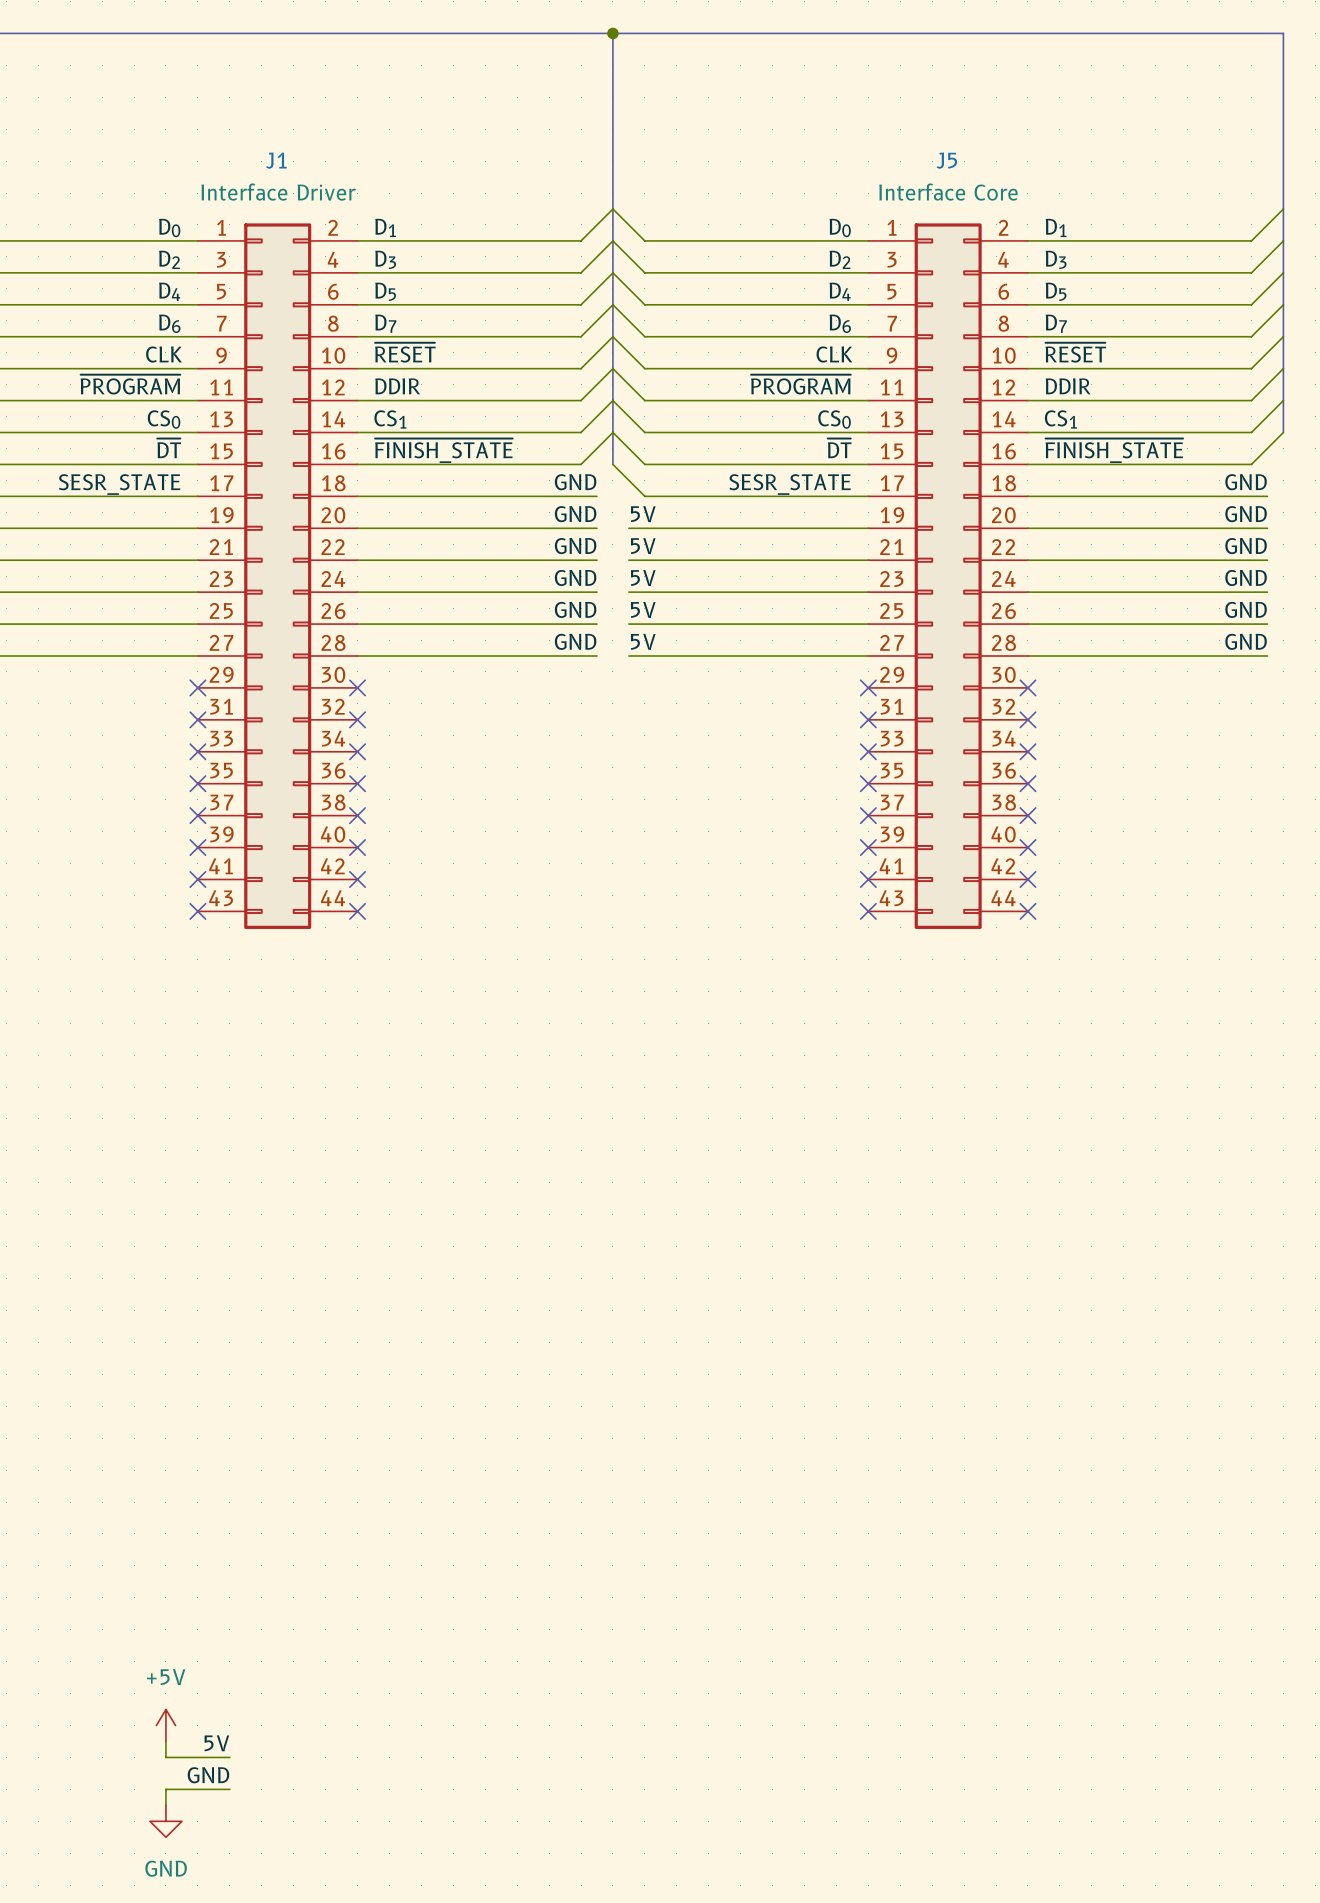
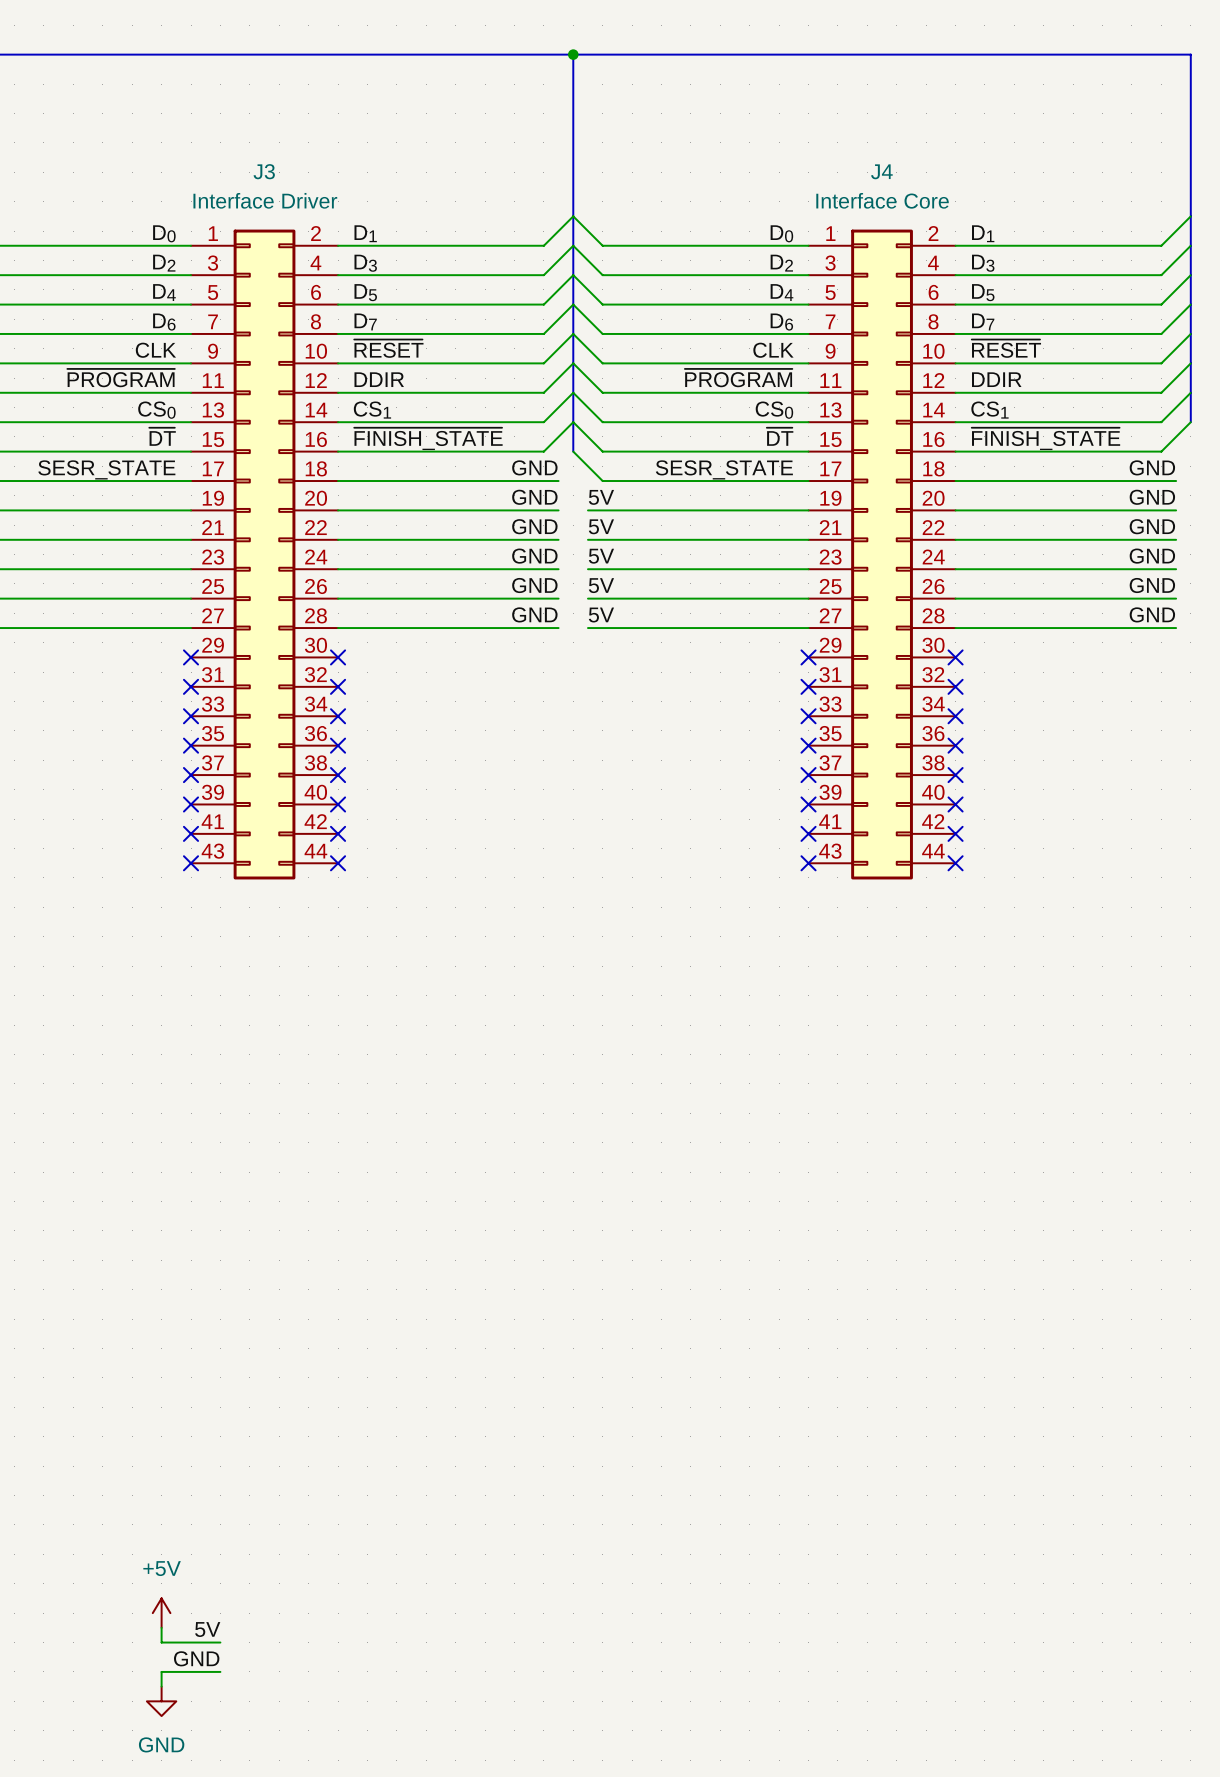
J1 name: J1 (276, 160) -> J3 (264, 171)
J5 name: J5 (946, 160) -> J4 (881, 171)

